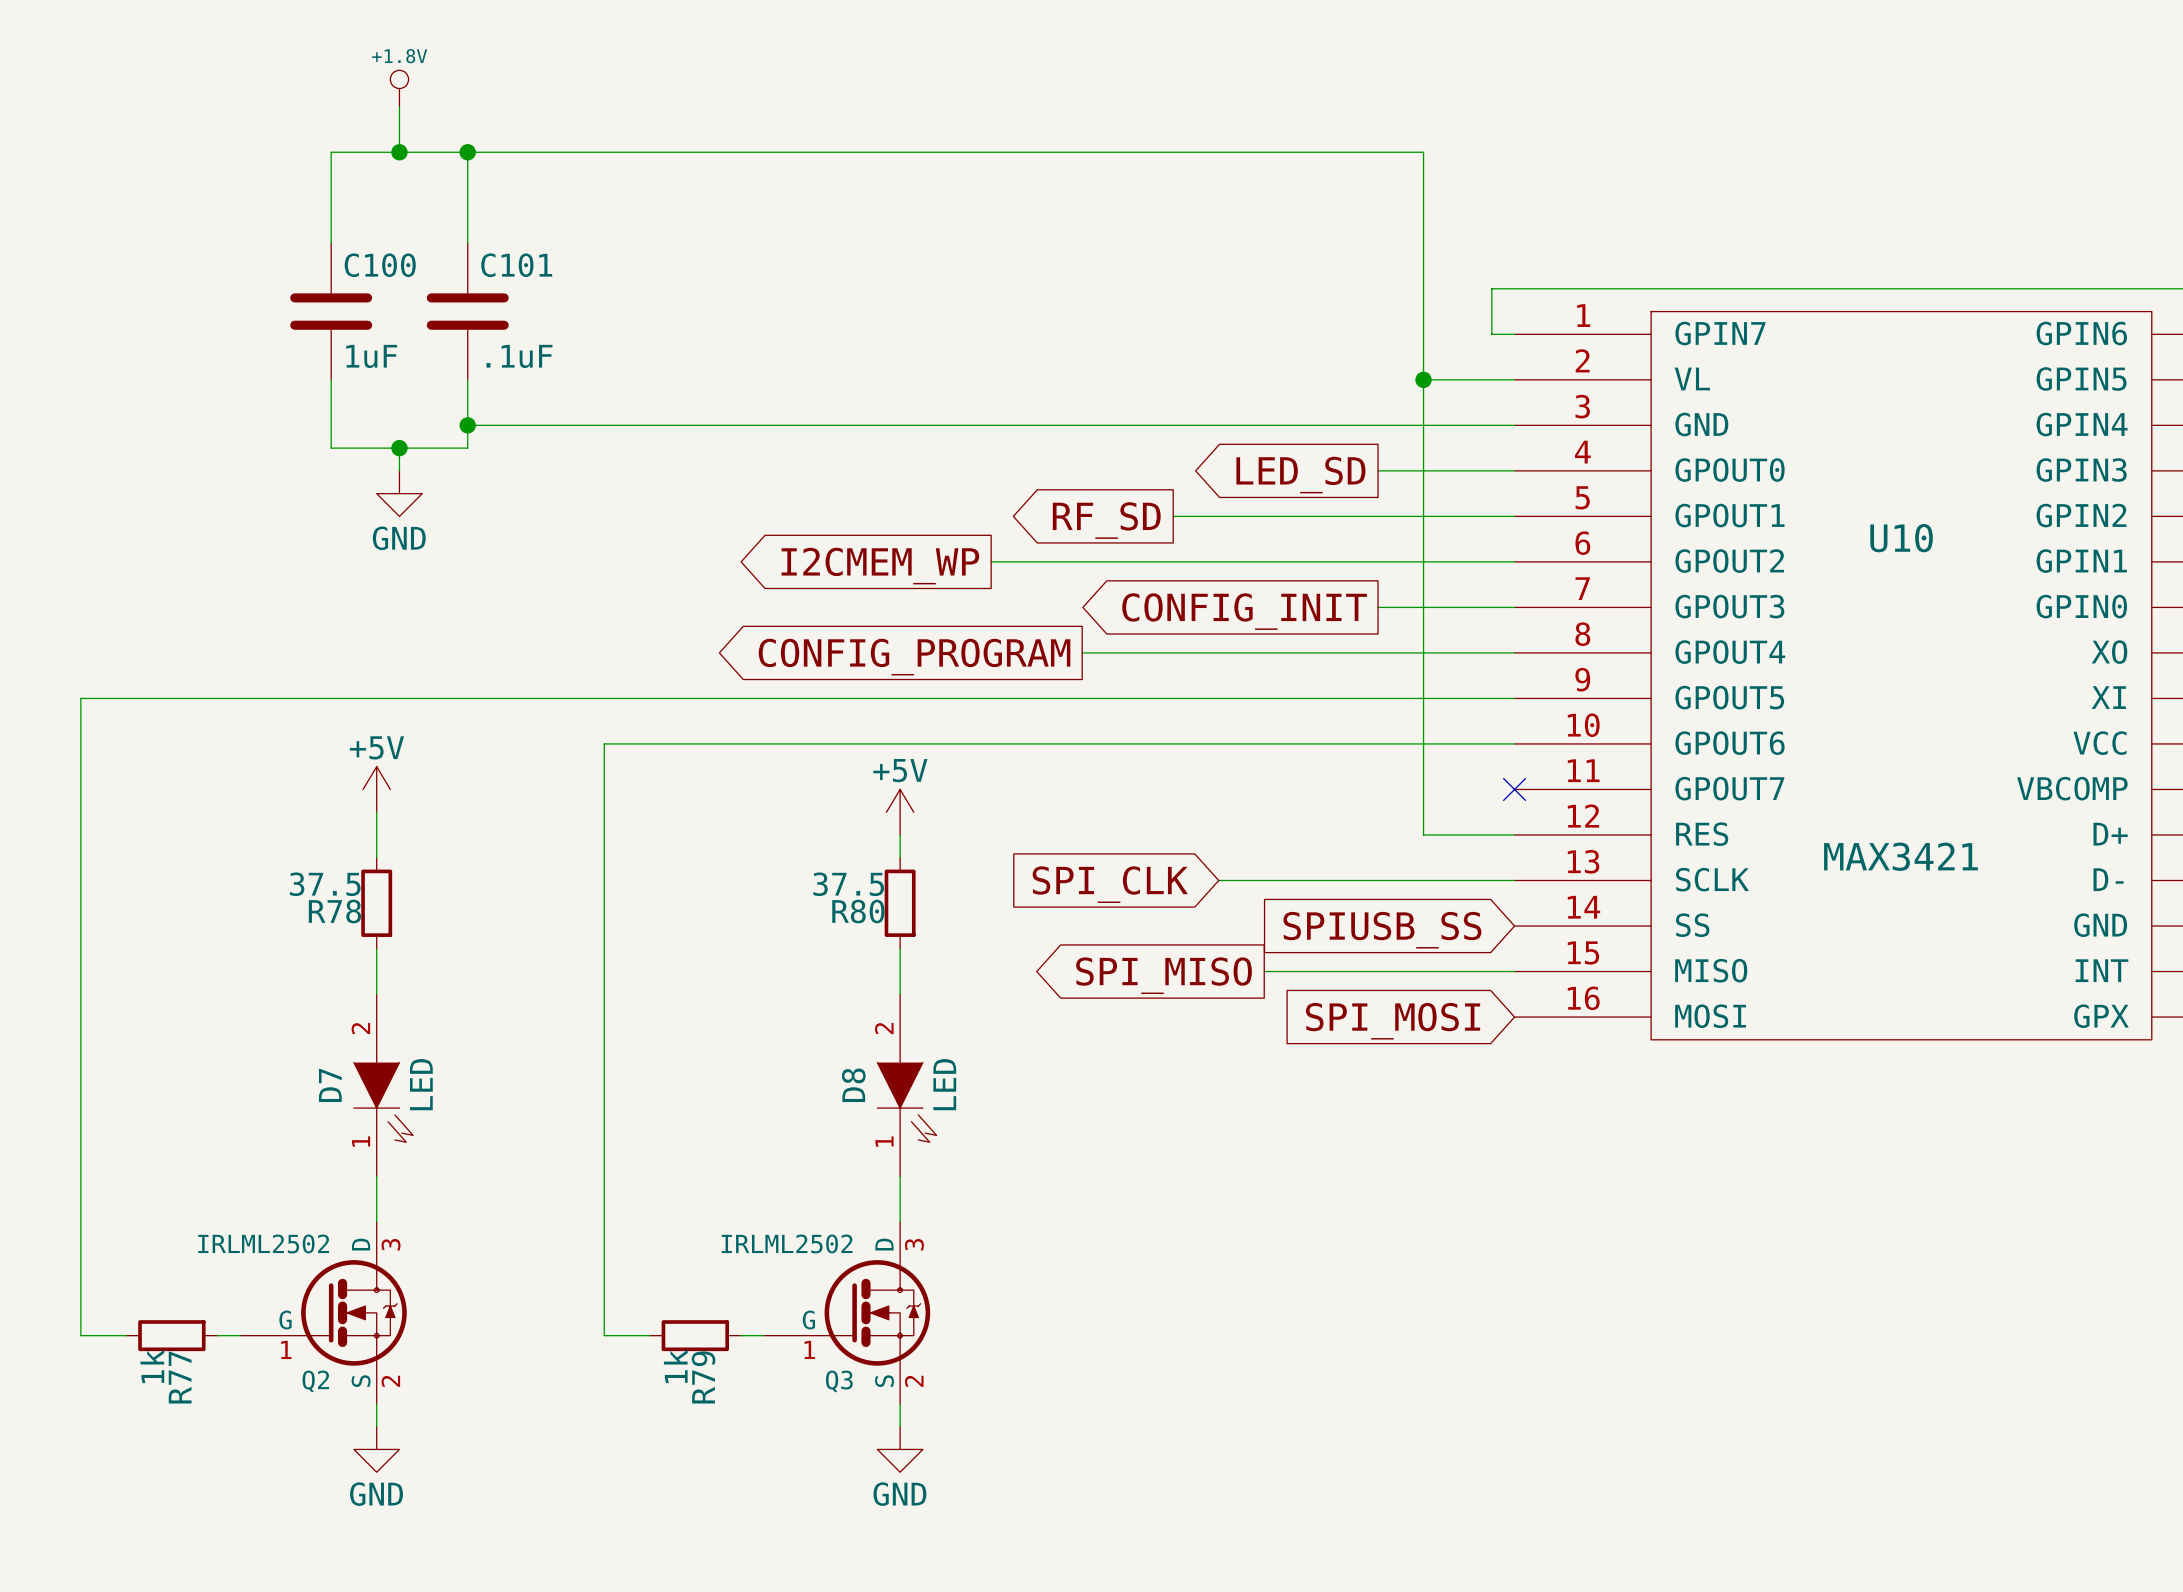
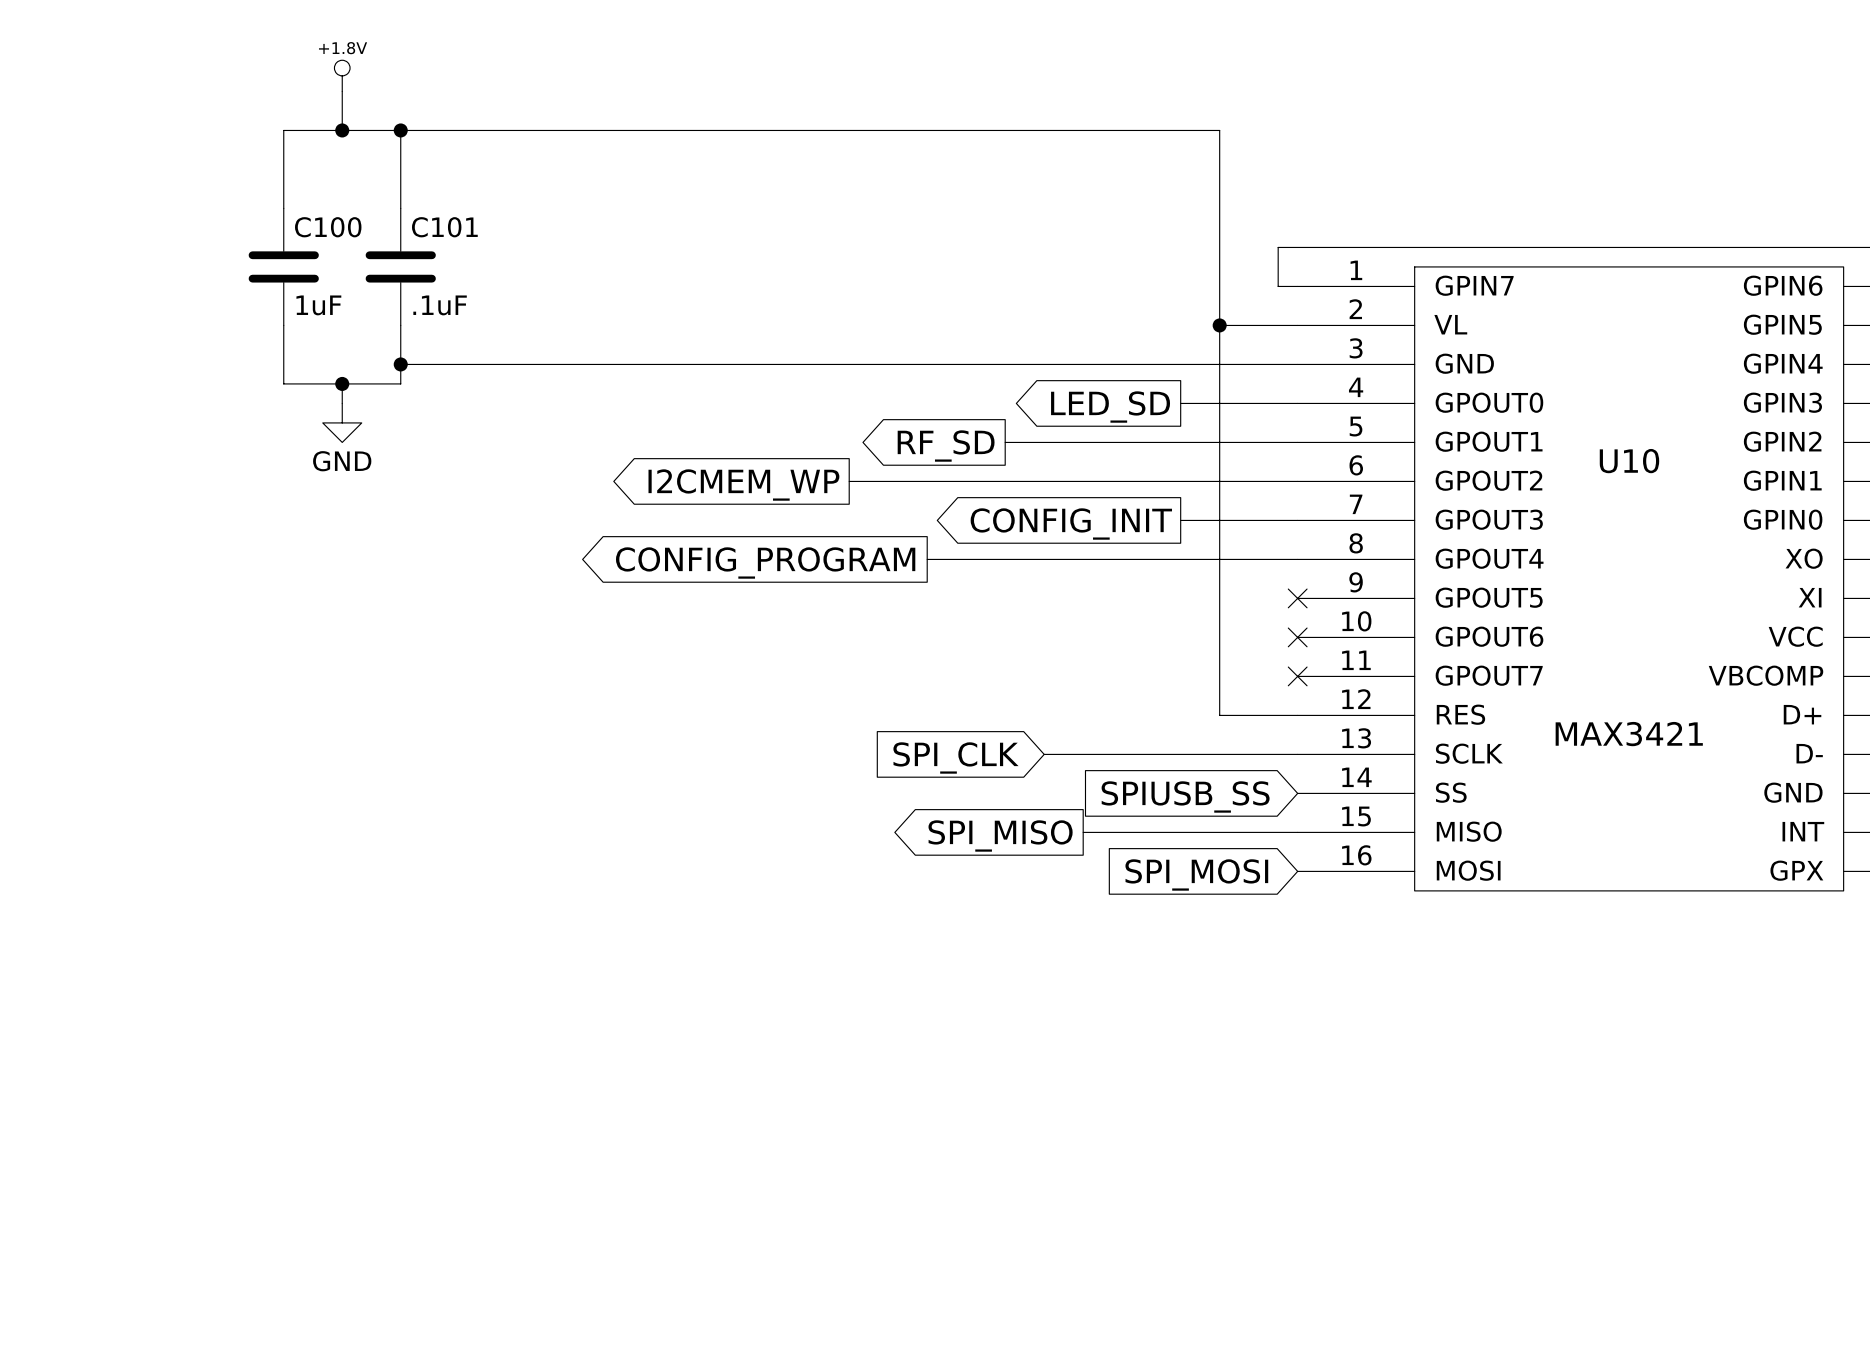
wire: (1514, 698) (80, 698) (80, 1335) (126, 1335) -> none
no-connect mark: none -> (1297, 598)
wire: (1514, 743) (604, 743) (604, 1335) (649, 1335) -> none
no-connect mark: none -> (1297, 637)
power symbol: +5V (376, 789) -> none
wire: (376, 812) (376, 857) -> none
power symbol: +5V (900, 812) -> none
wire: (900, 834) (900, 857) -> none
R78: 37.5 (376, 903) -> none
R80: 37.5 (900, 903) -> none
wire: (376, 948) (376, 994) -> none
wire: (900, 948) (900, 994) -> none
D7: LED (383, 1085) -> none
D8: LED (906, 1085) -> none
wire: (376, 1176) (376, 1221) -> none
wire: (900, 1176) (900, 1221) -> none
Q2: IRLML2502 (323, 1312) -> none
Q3: IRLML2502 (846, 1312) -> none
R77: 1k (171, 1335) -> none
wire: (217, 1335) (240, 1335) -> none
R79: 1k (695, 1335) -> none
wire: (740, 1335) (763, 1335) -> none
wire: (376, 1403) (376, 1426) -> none
wire: (900, 1403) (900, 1426) -> none
power symbol: GND (376, 1449) -> none
power symbol: GND (900, 1449) -> none

